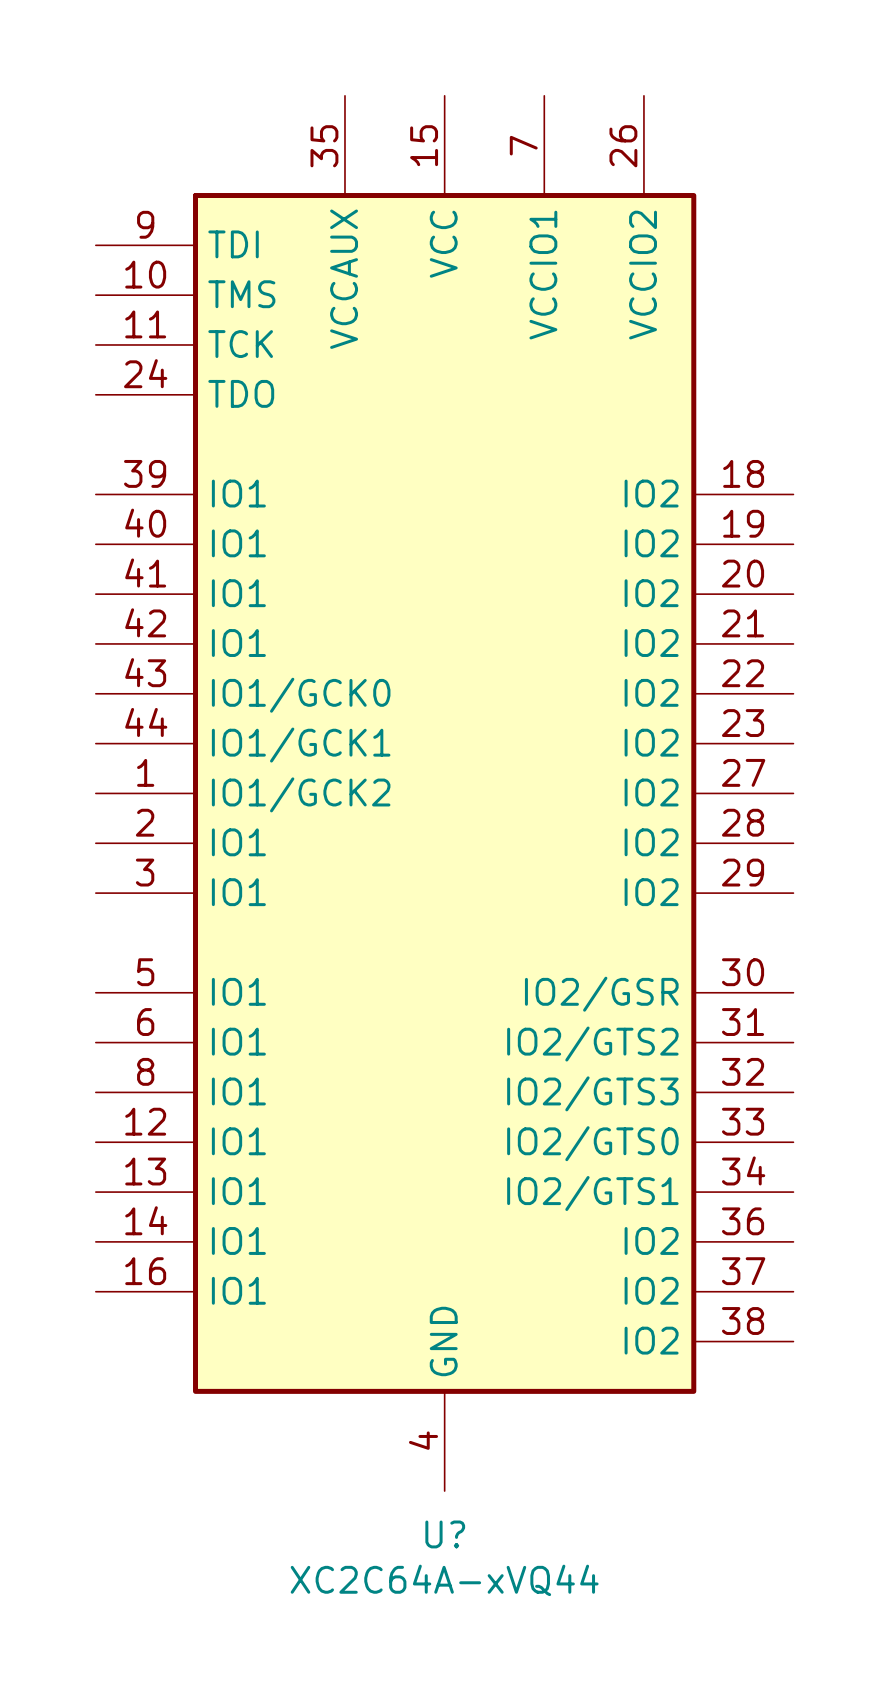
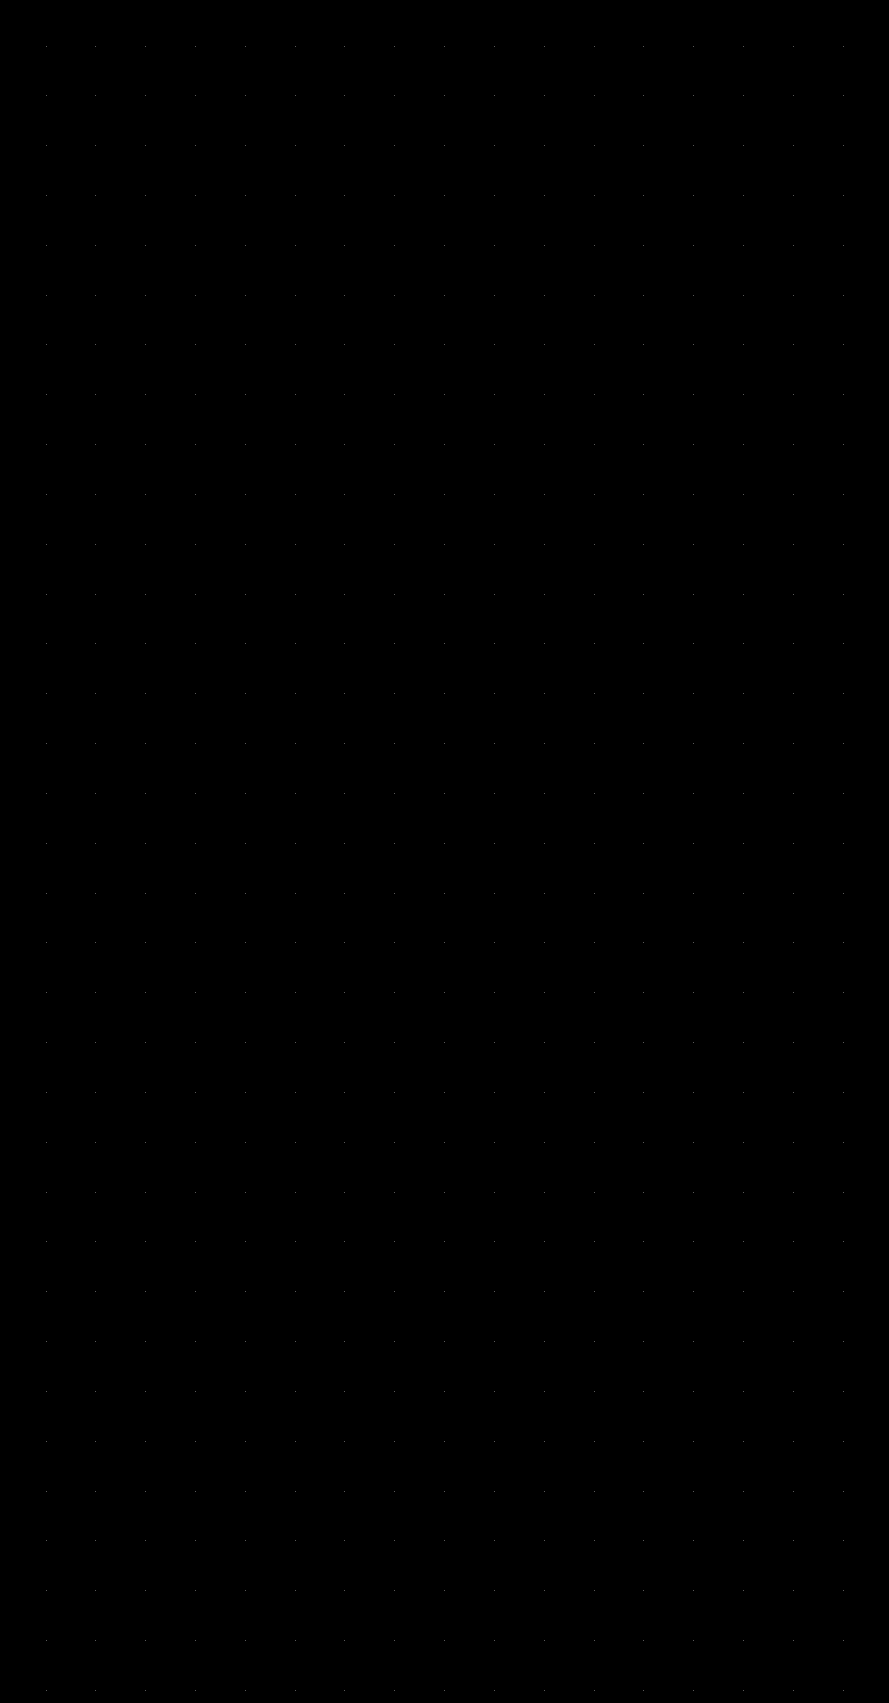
U?: XC2C64A-xVQ44 (444, 793) -> none

